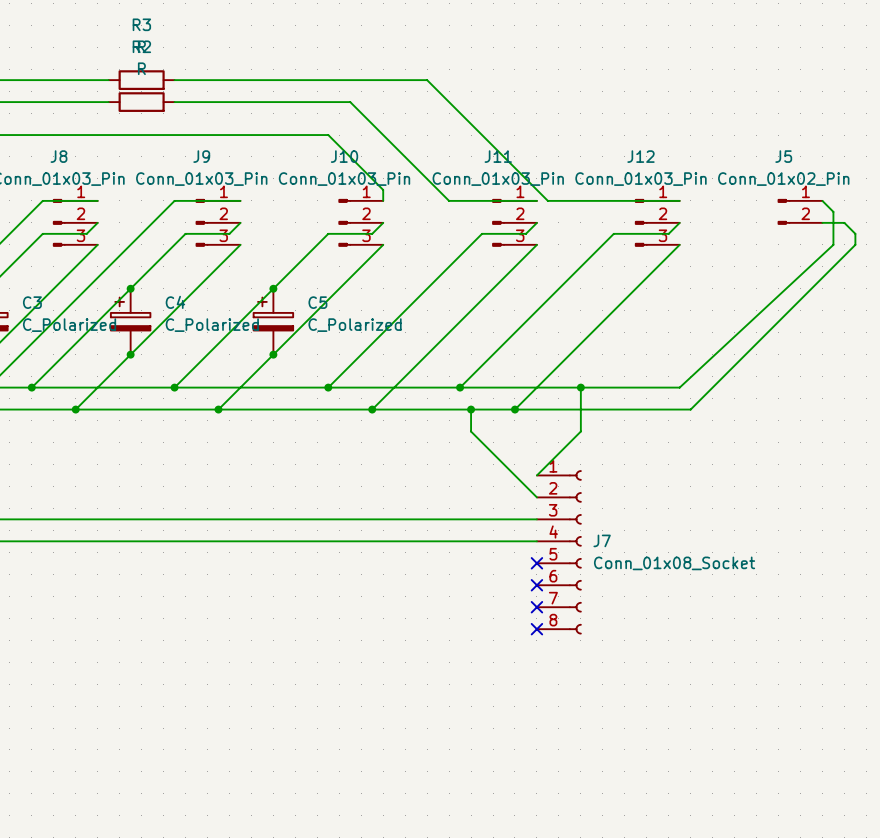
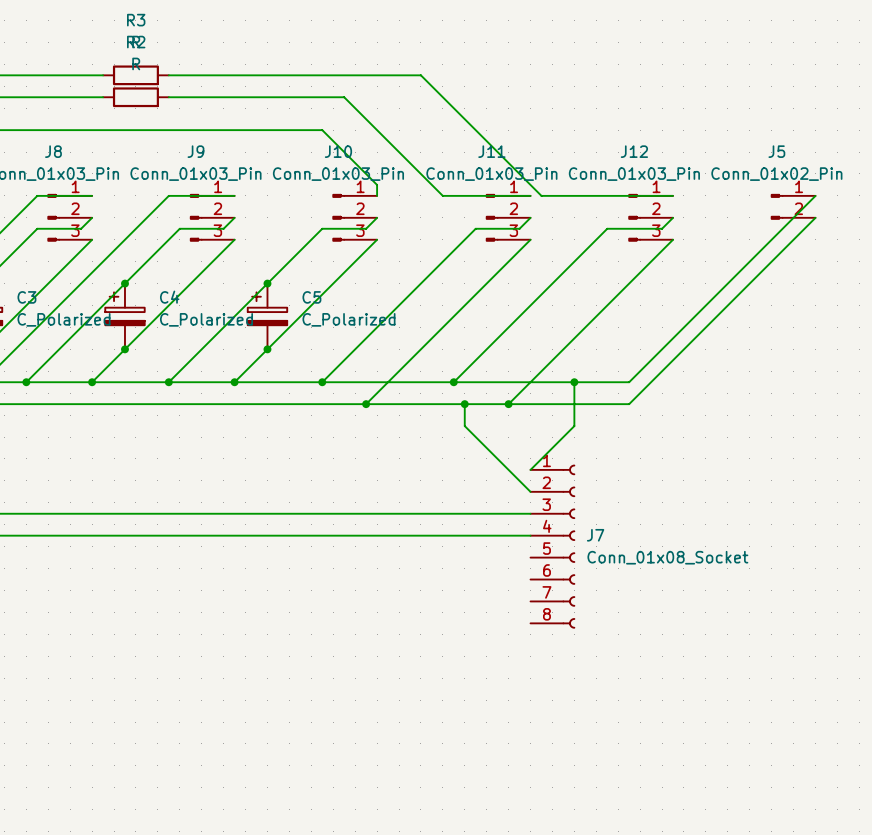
wire: (822, 200) (833, 211) (833, 244) (679, 387) (635, 387) -> (815, 195) (629, 382)
wire: (822, 222) (844, 222) (855, 233) (855, 244) (690, 409) (635, 409) -> (815, 217) (629, 404)
wire: (97, 387) (75, 409) -> none
wire: (240, 387) (218, 409) -> none
junction position: (75, 409) -> (92, 382)
junction position: (218, 409) -> (234, 382)
no-connect mark: (536, 563) -> none
no-connect mark: (536, 585) -> none
no-connect mark: (536, 607) -> none
no-connect mark: (536, 629) -> none

